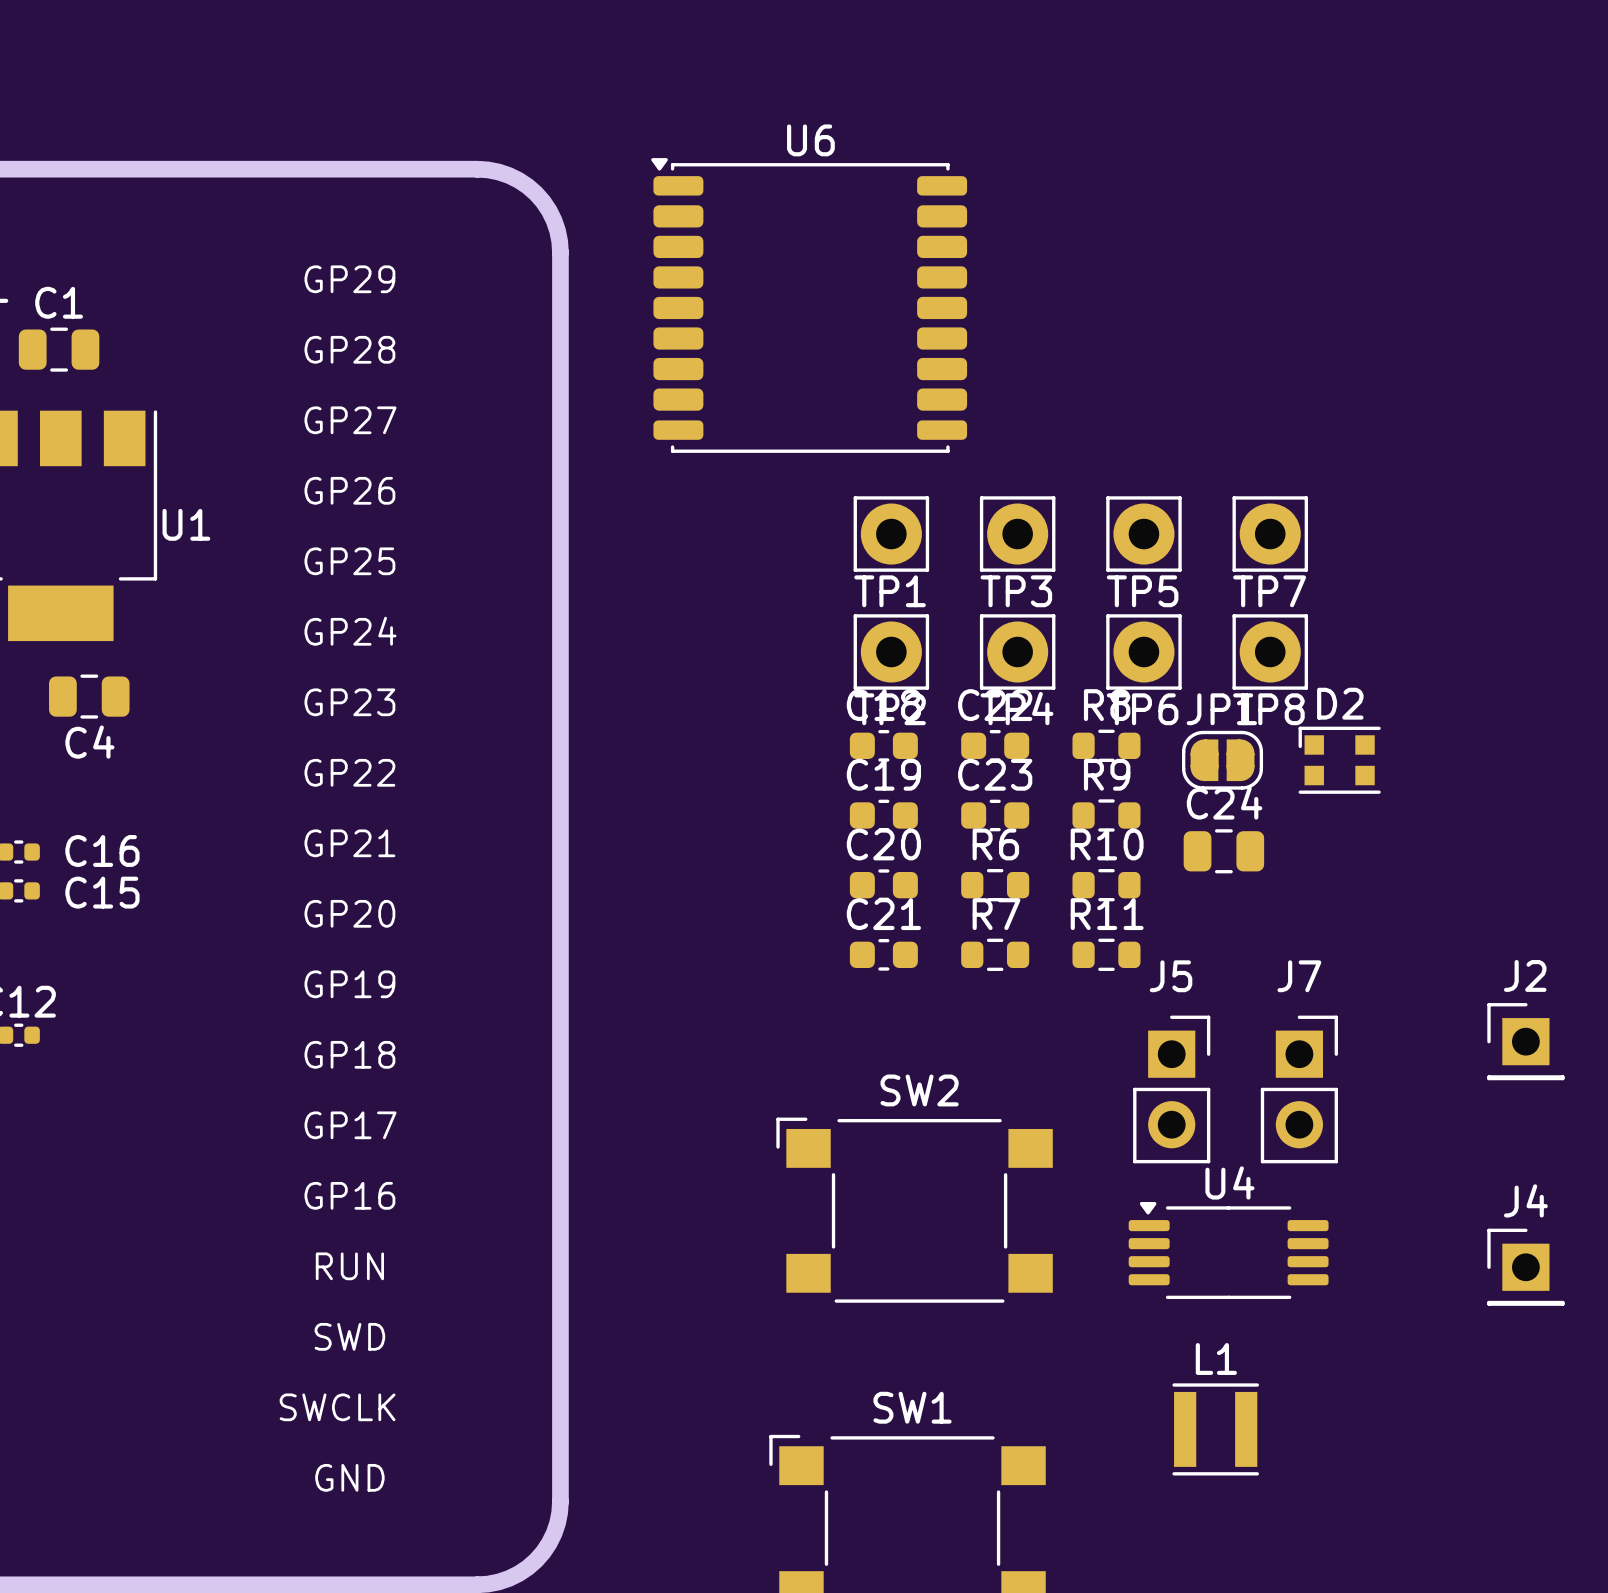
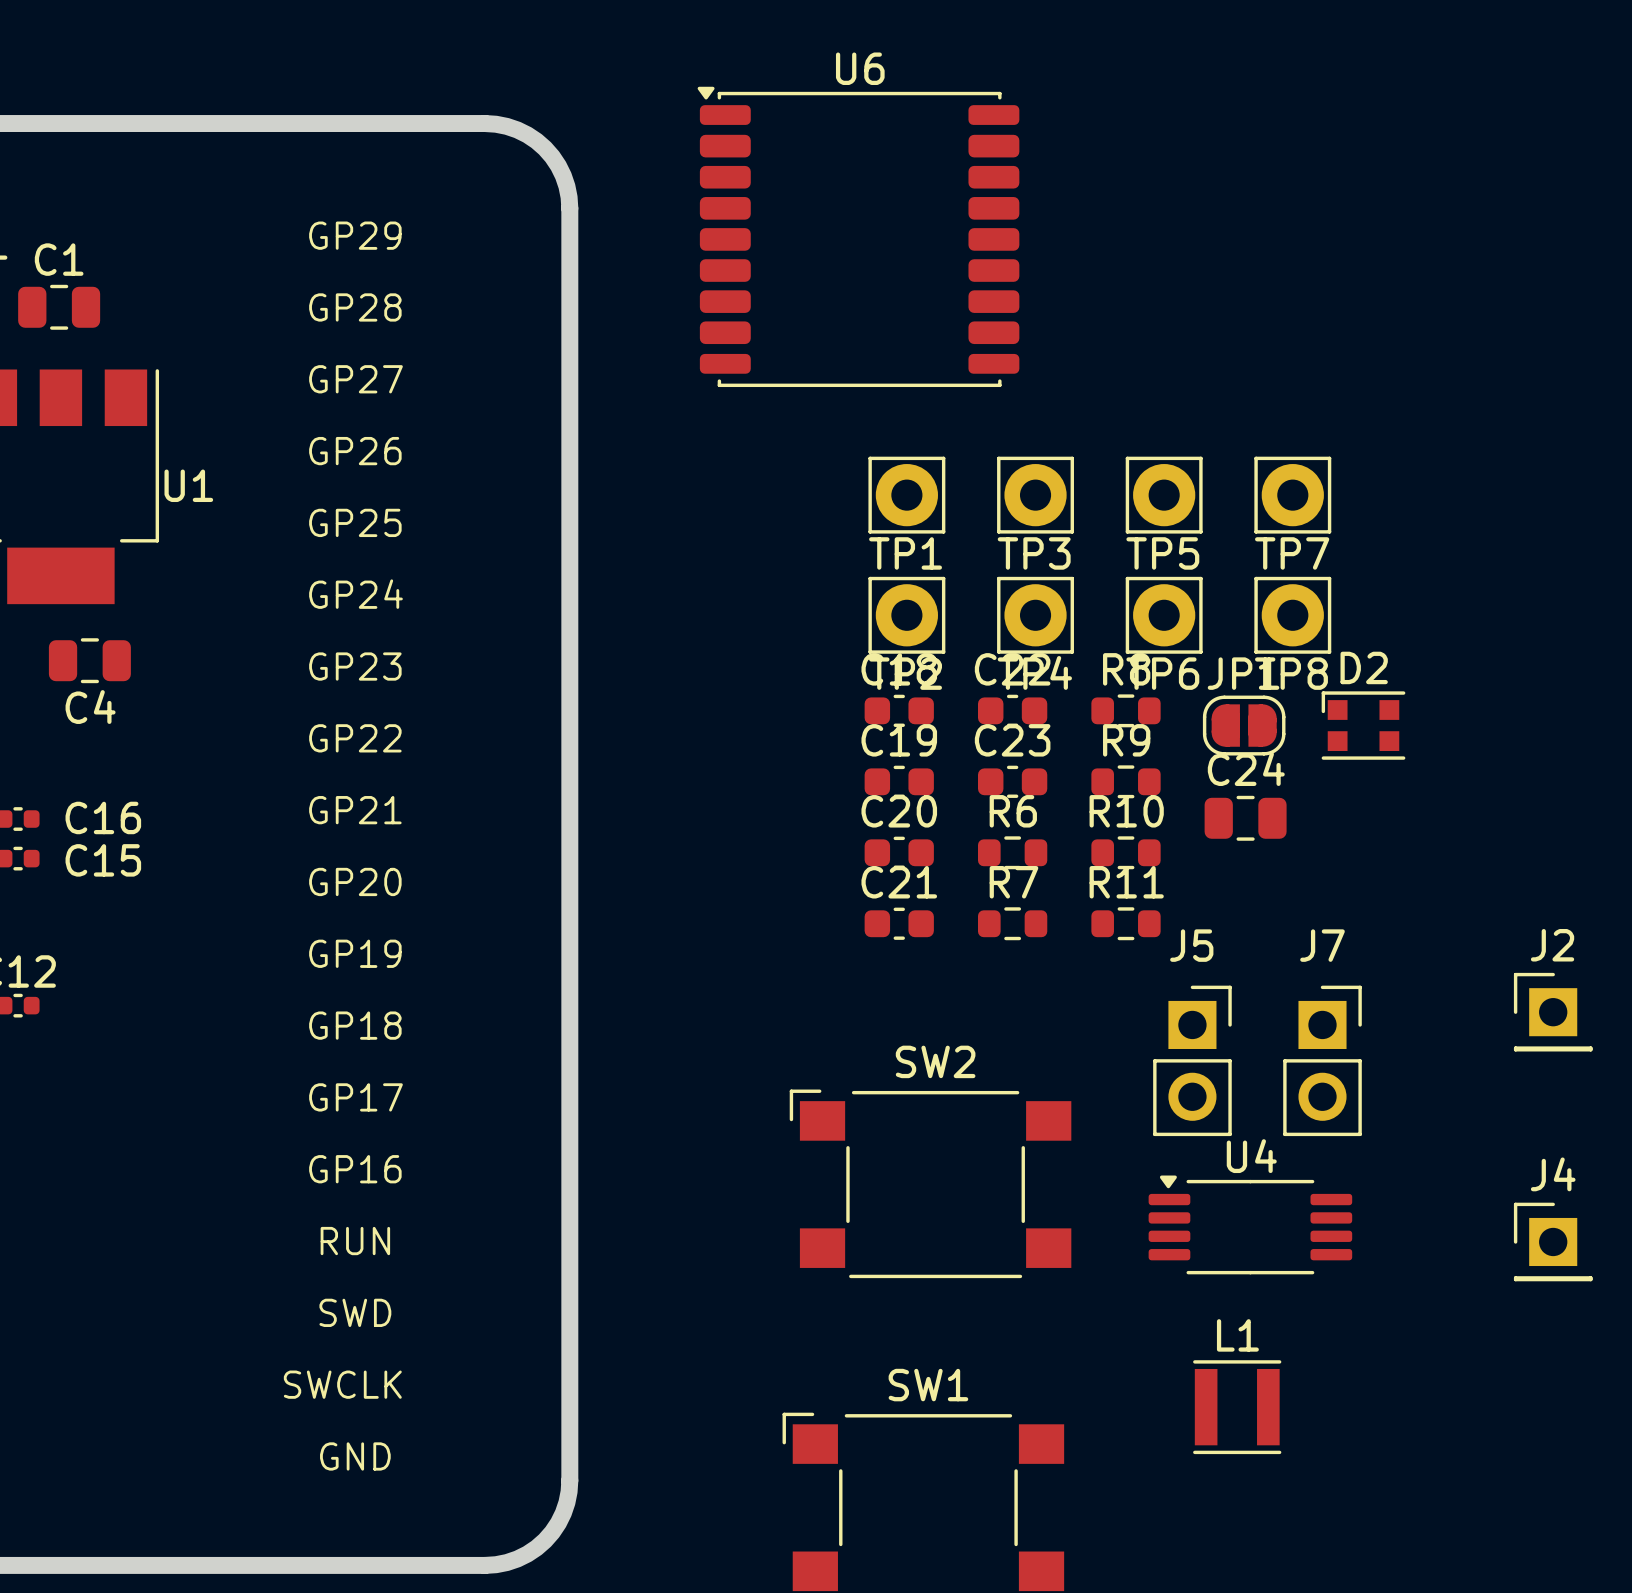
U6 position: (809, 305) -> (858, 236)

